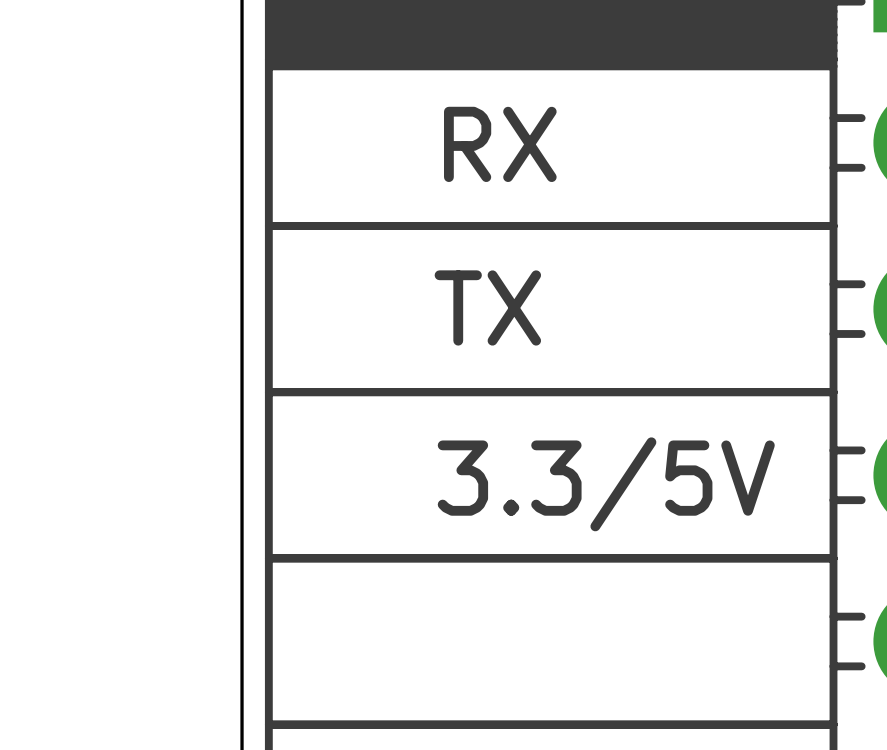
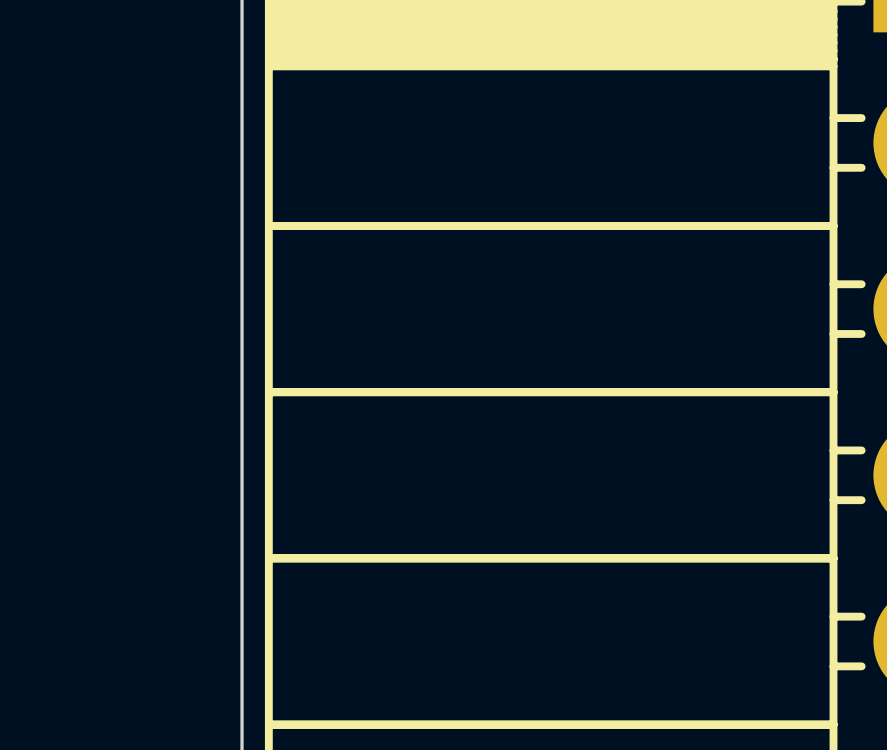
text: RX (500, 144) -> none
text: TX (487, 307) -> none
text: 3.3/5V (606, 484) -> none

